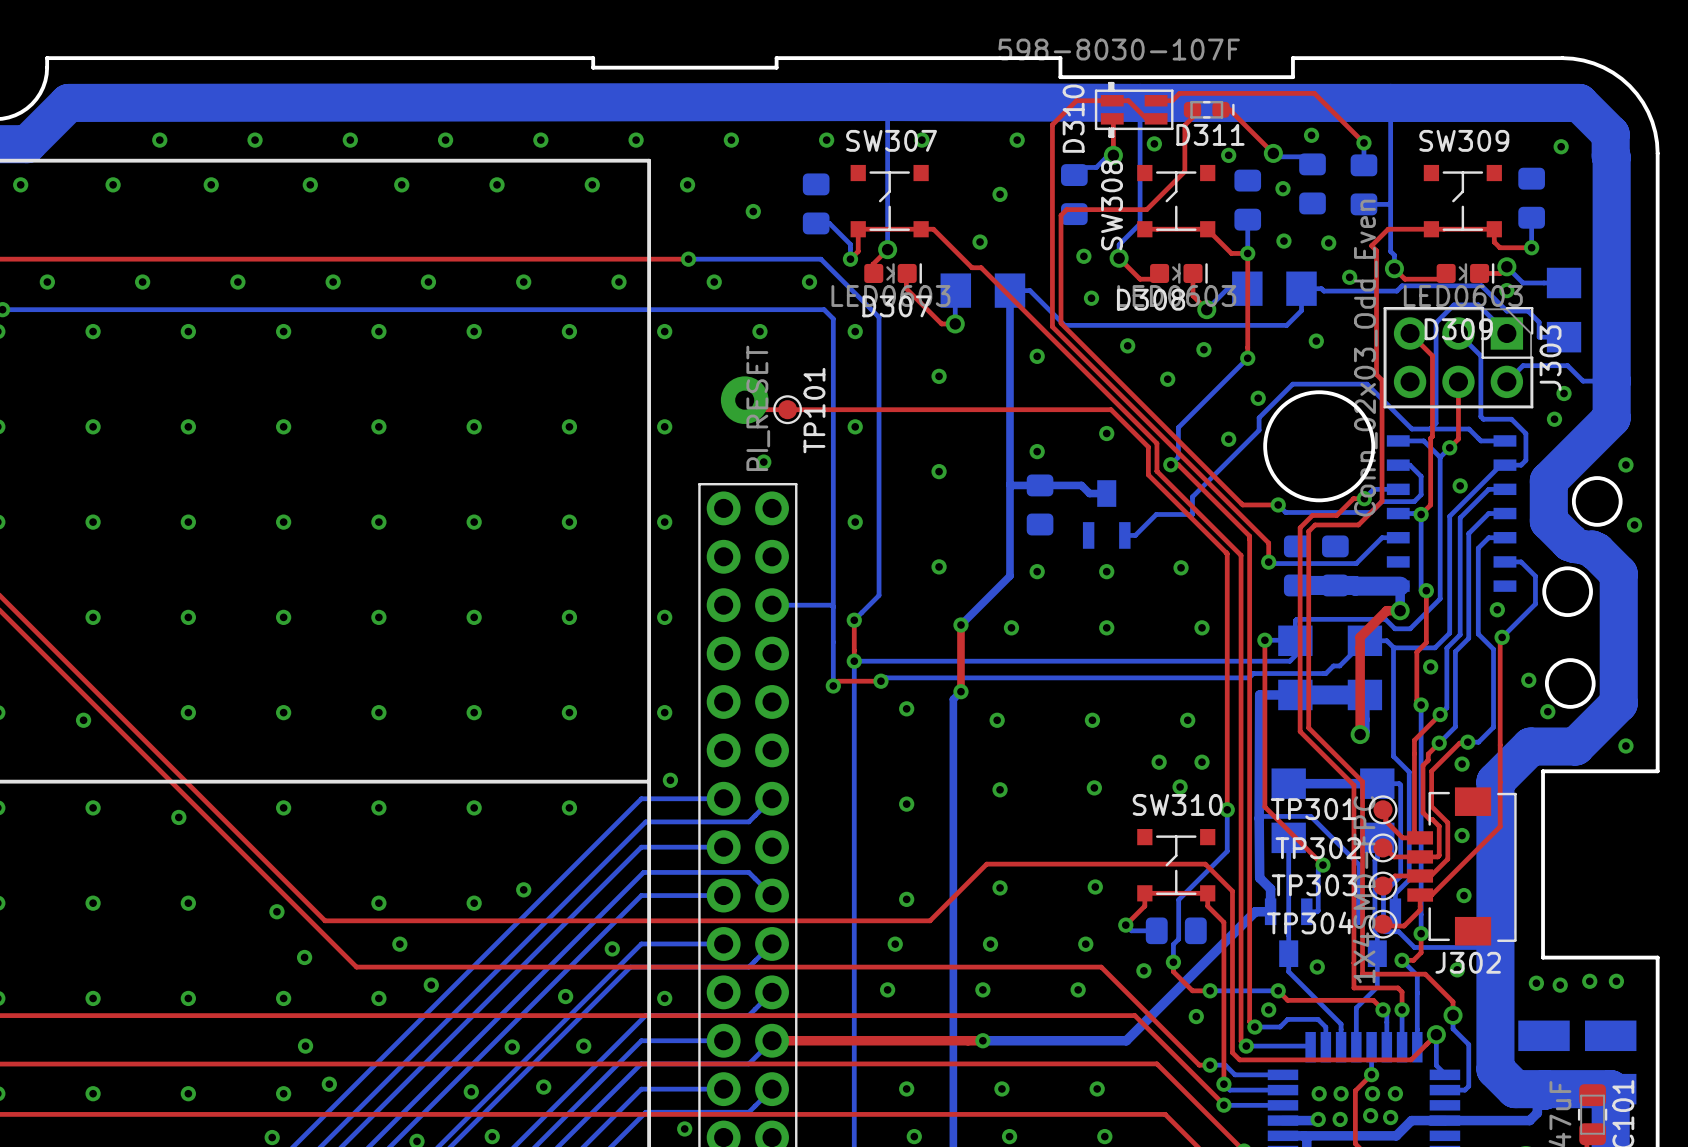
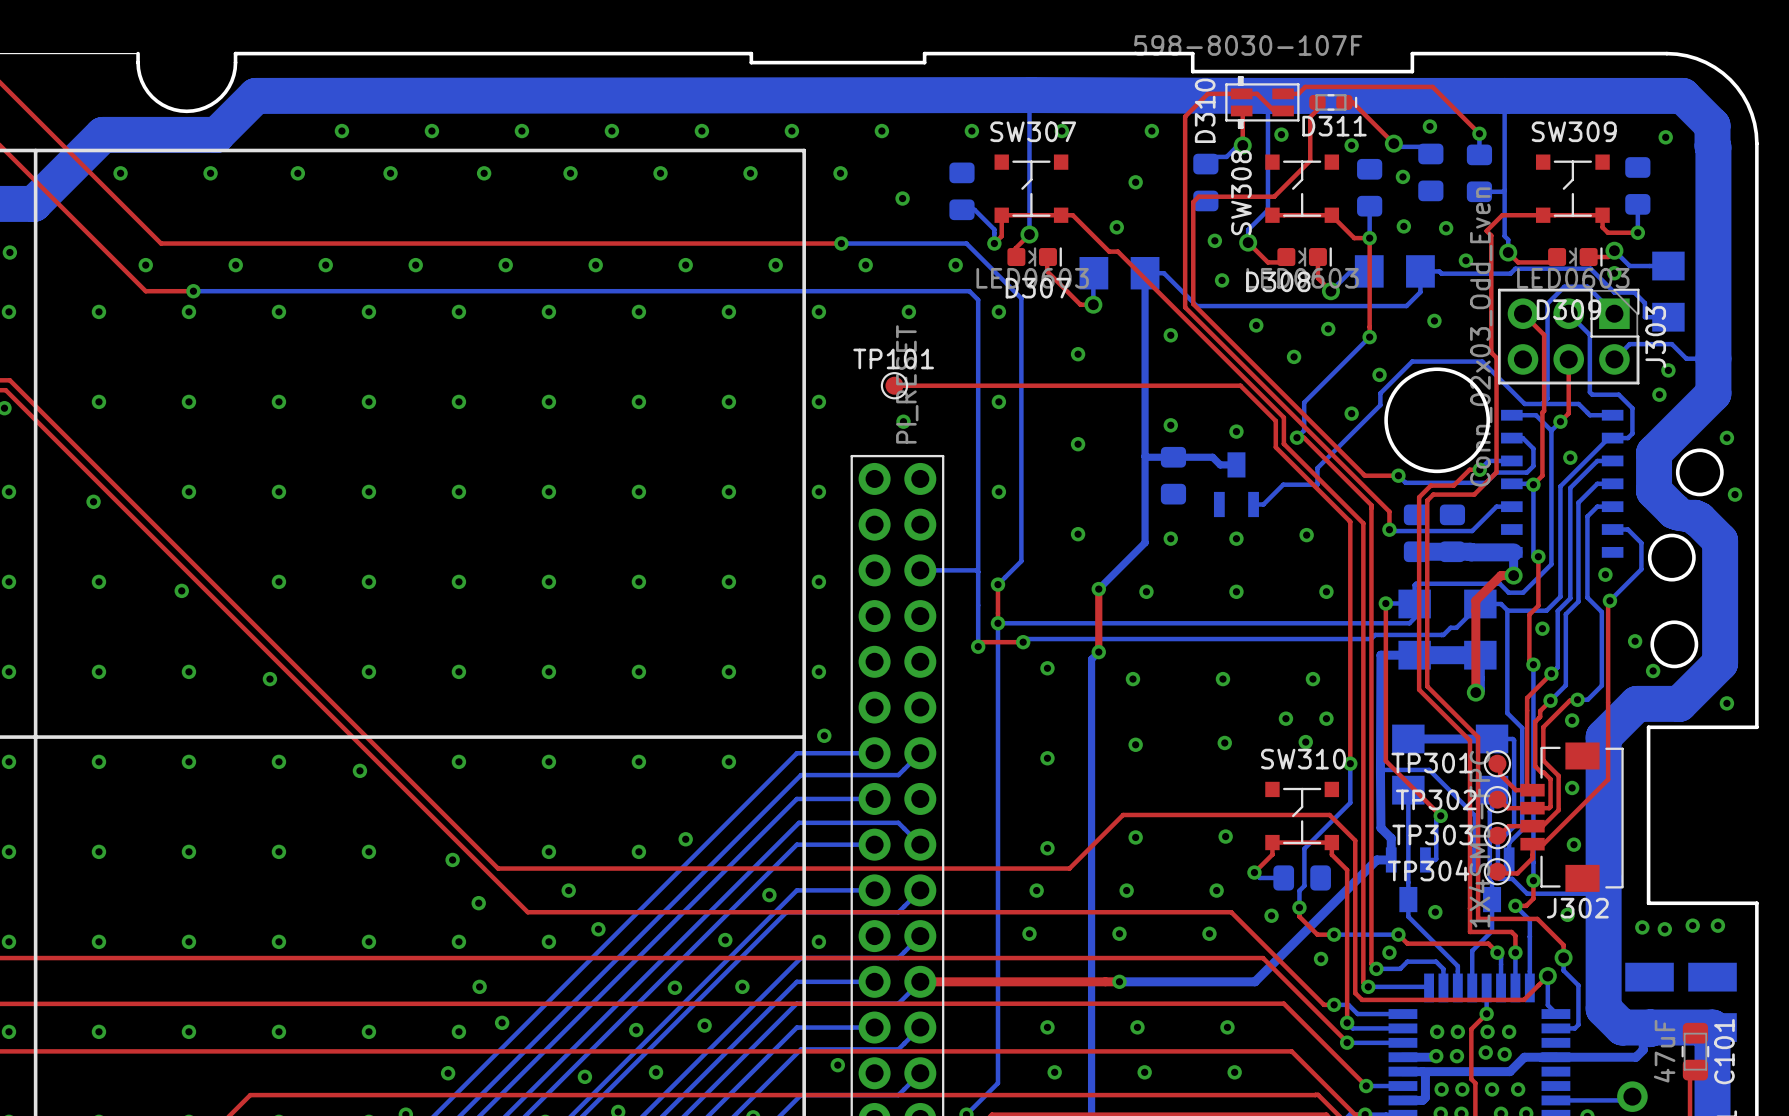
via: (744, 400) -> none
TP101 position: (787, 409) -> (894, 385)
TP101 name rotation: 0° (814, 410) -> 90° clockwise (893, 358)
via position: (1106, 433) -> (1236, 431)
via position: (763, 462) -> (903, 421)

